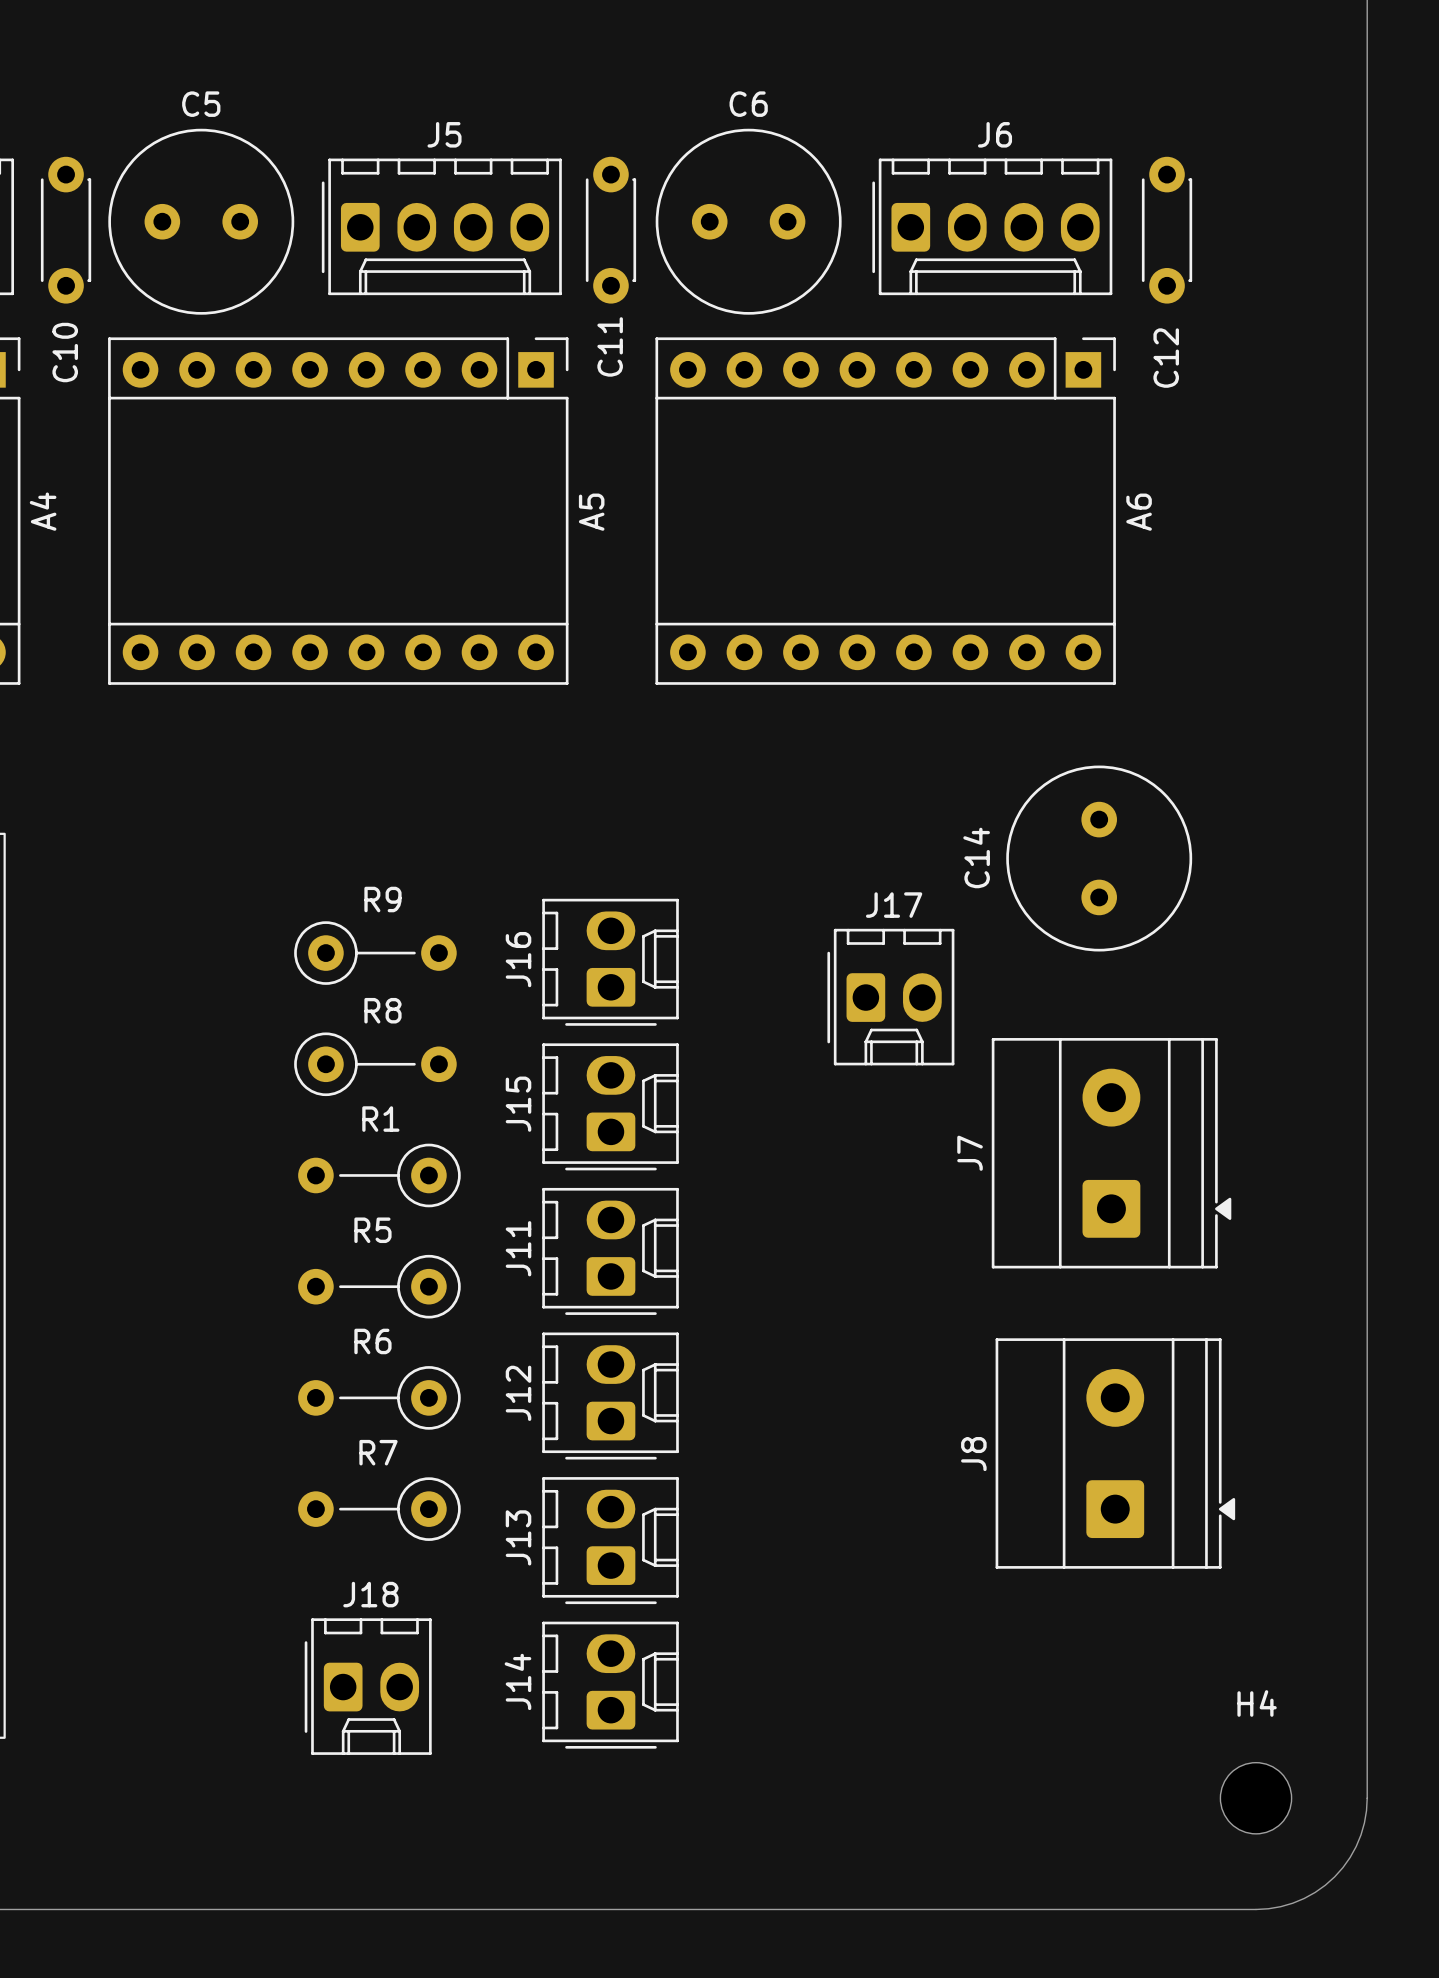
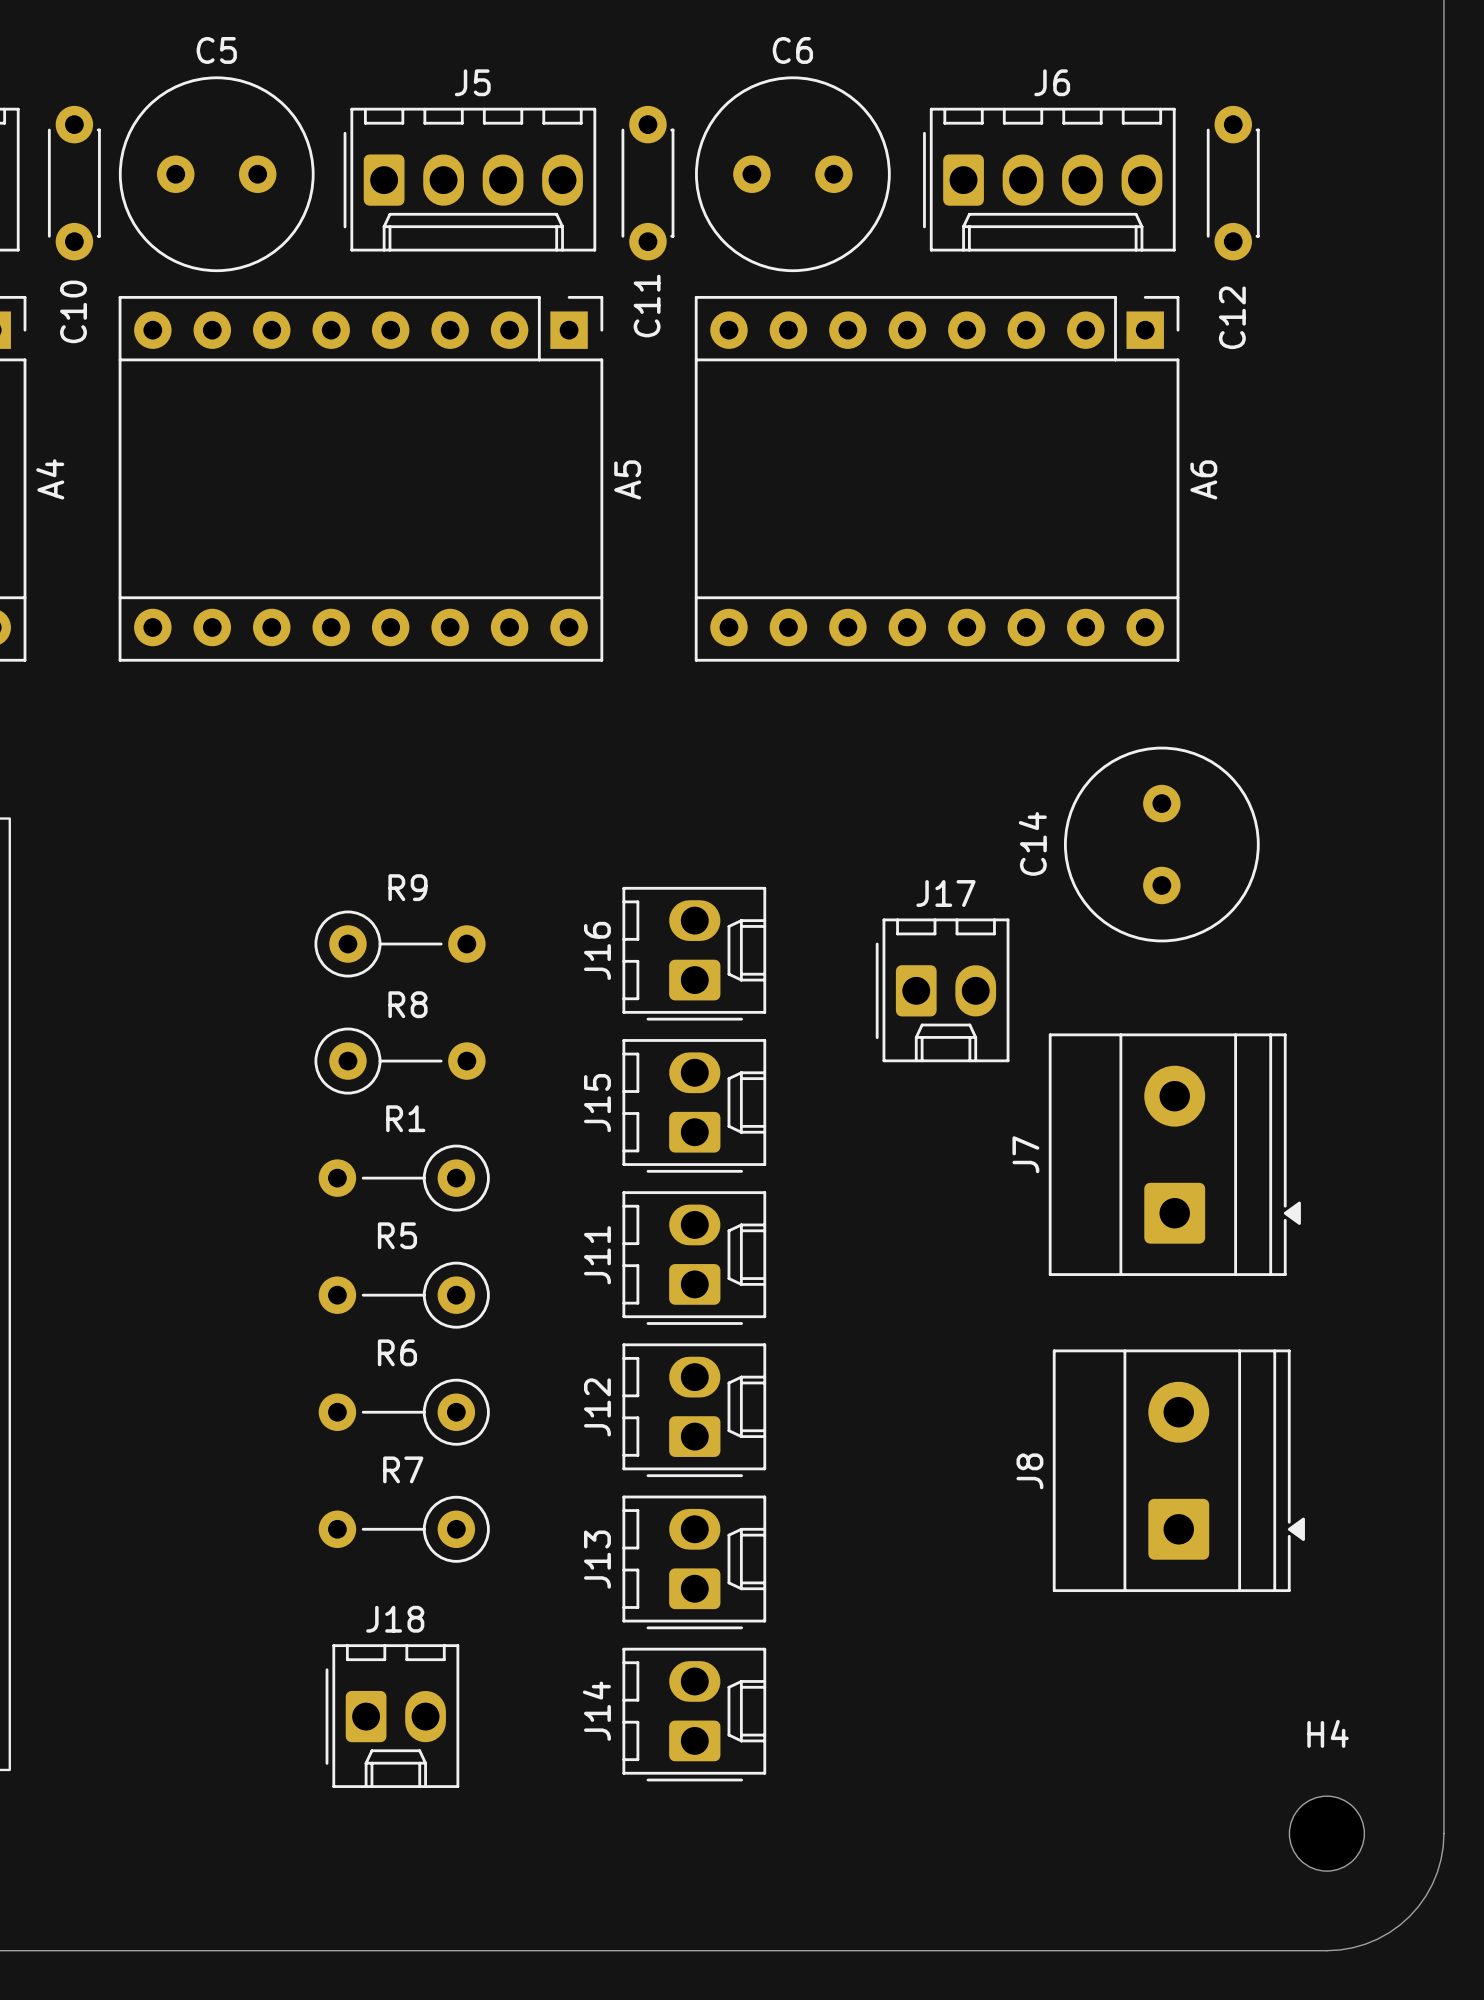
J16 position: (610, 962) -> (694, 953)
J15 position: (610, 1106) -> (694, 1105)
J11 position: (610, 1251) -> (694, 1258)
J12 position: (610, 1396) -> (694, 1410)
J13 position: (610, 1540) -> (694, 1562)
J14 position: (610, 1685) -> (694, 1714)

